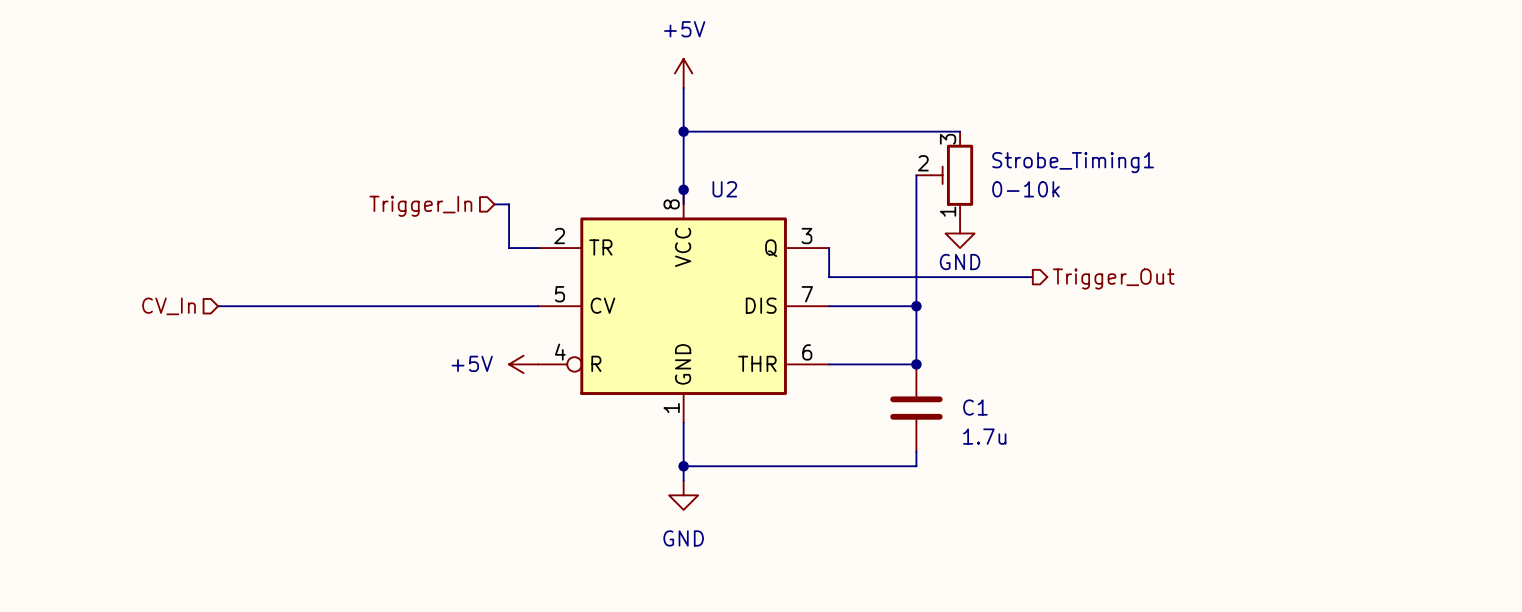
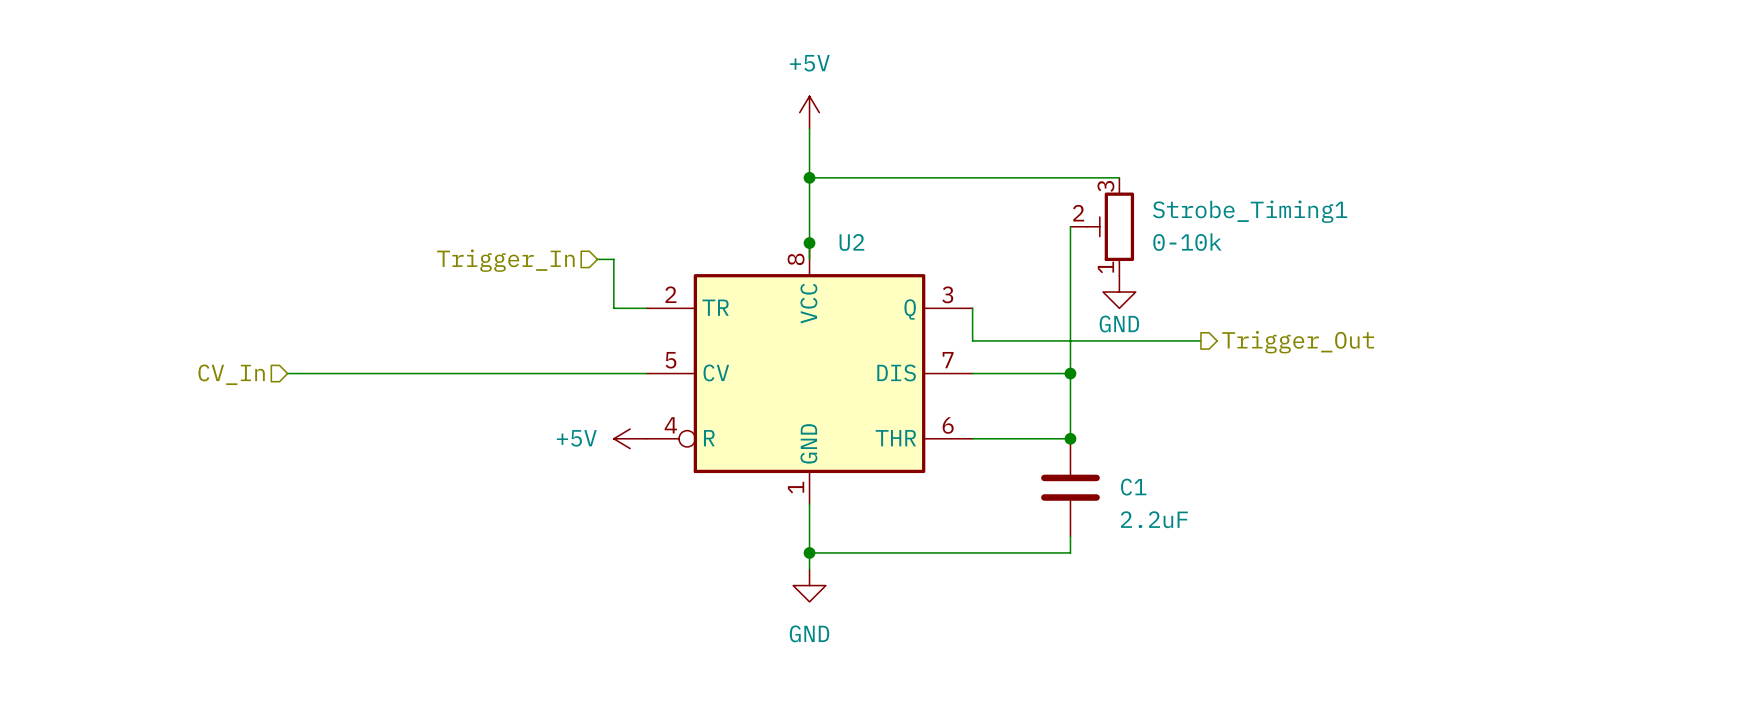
C1 value: 1.7u (984, 436) -> 2.2uF (1154, 519)

